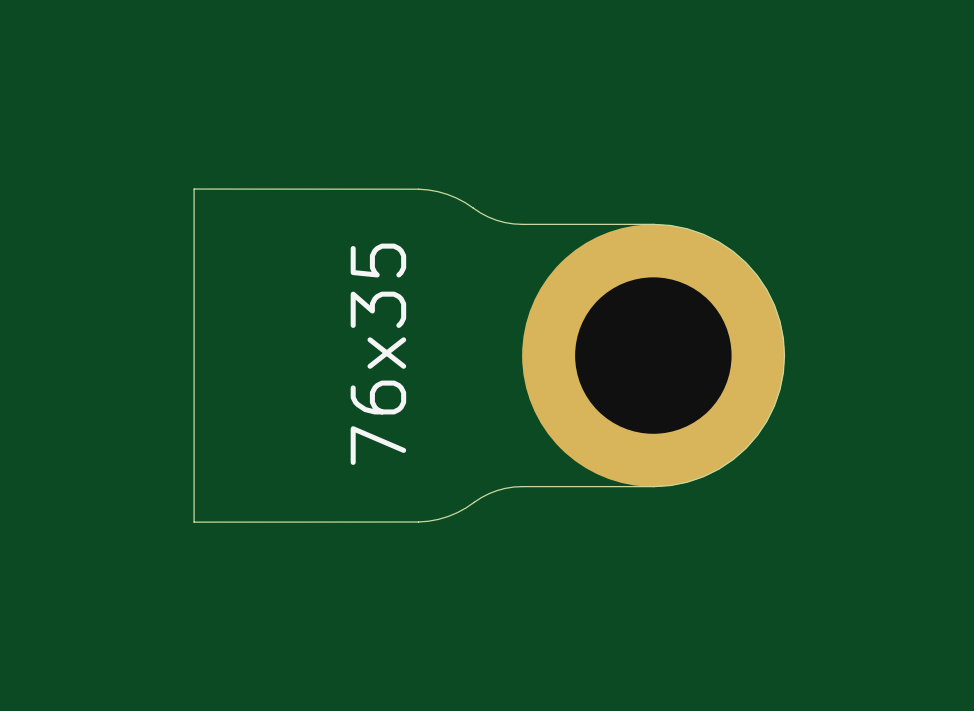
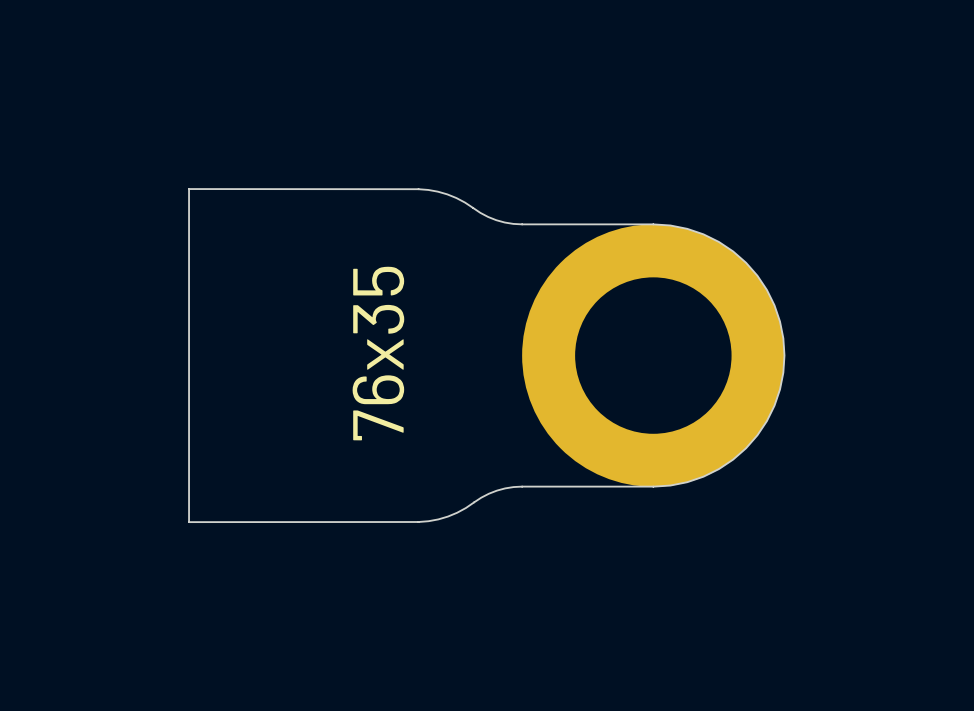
part footprint: [193, 188, 785, 523] -> [188, 188, 785, 523]

